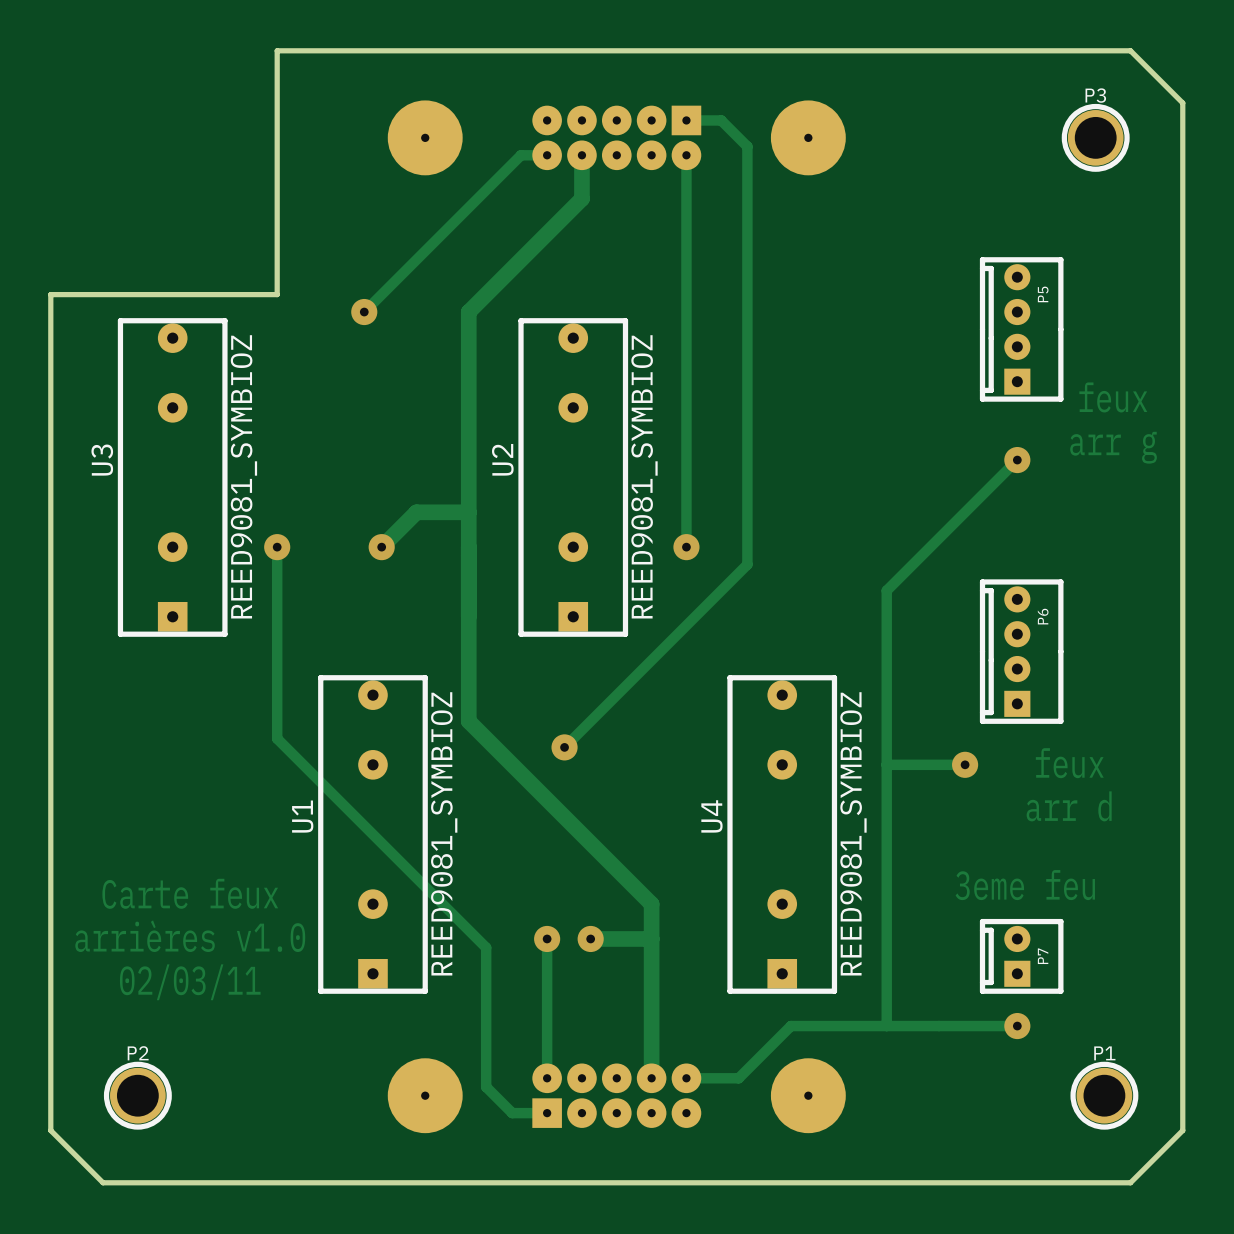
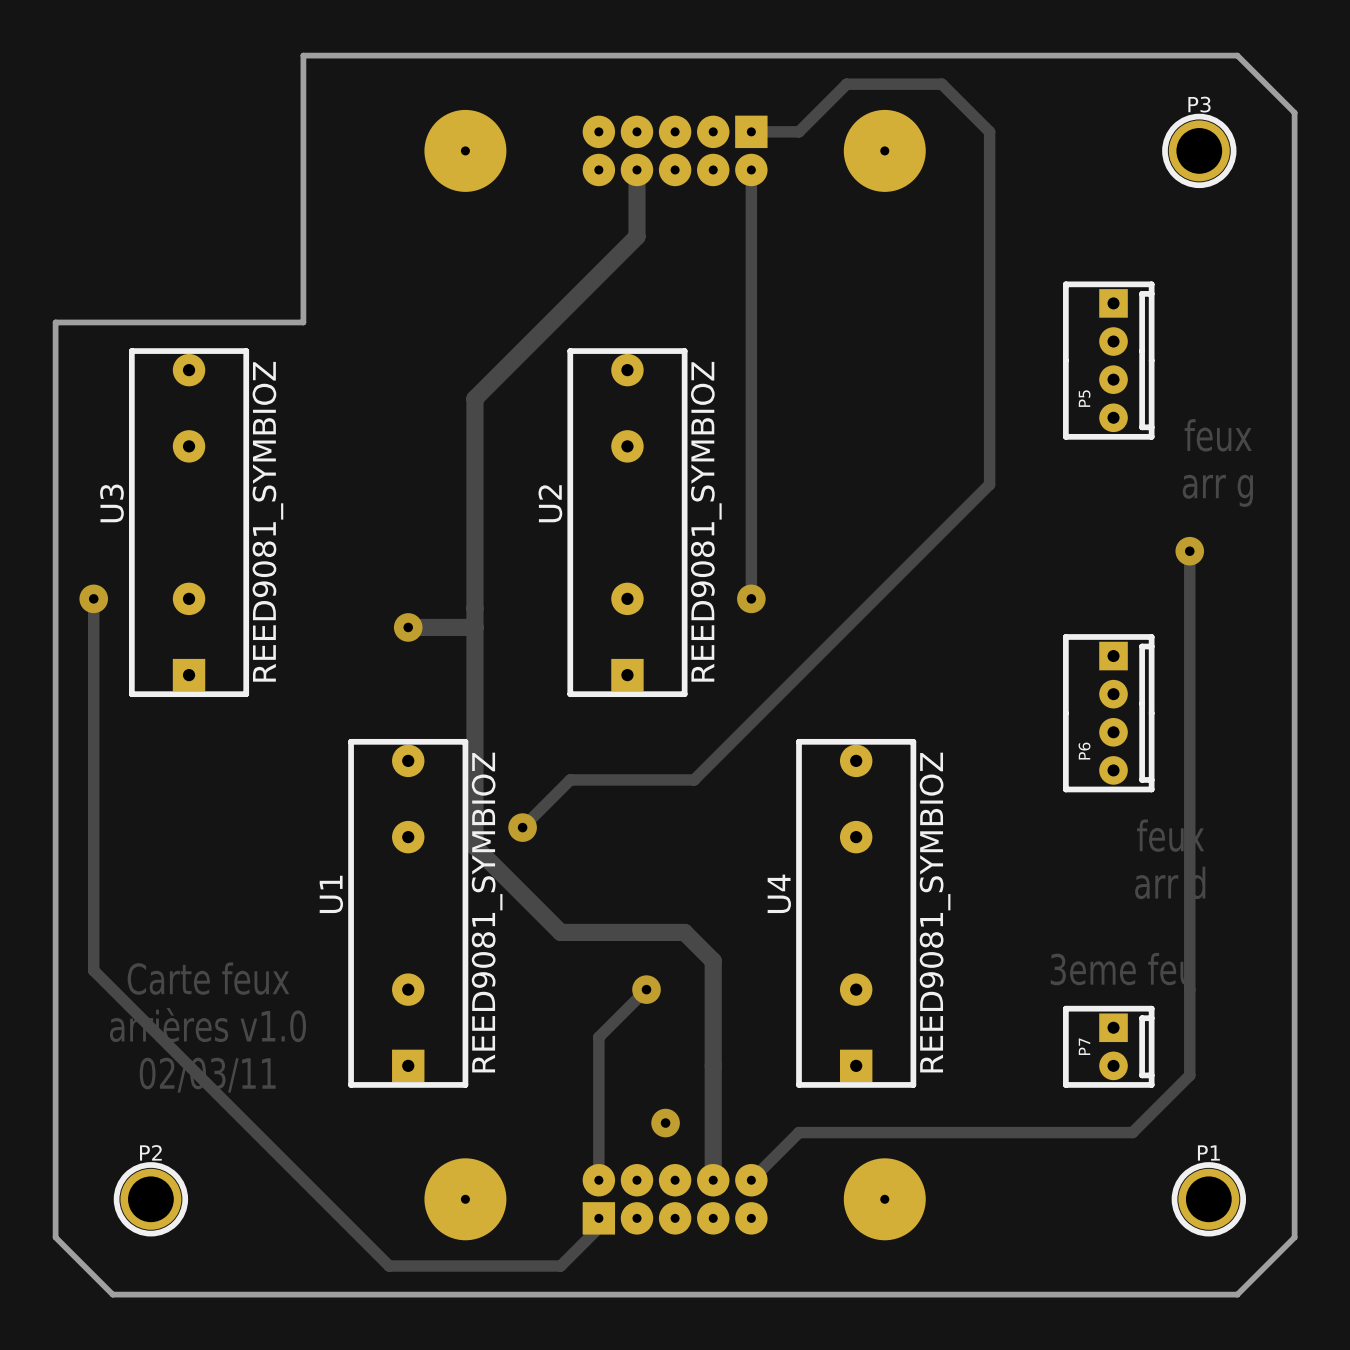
track: (721, 120) (747, 146) (747, 564) (564, 747) -> (789, 131) (799, 131) (846, 84) (941, 84) (989, 131) (989, 484) (694, 779) (570, 779) (522, 827)
track: (547, 155) (521, 155) (364, 312) -> none
track: (581, 198) (468, 312) (468, 721) (651, 904) -> (636, 217) (636, 236) (474, 398) (474, 846) (560, 932) (684, 932) (713, 961) (713, 989)
via: (364, 312) -> none
P5 rotation: 0° (1021, 329) -> 180° (1108, 360)
track: (1017, 460) (886, 590) (886, 1026) -> none
via position: (1017, 460) -> (1189, 551)
track: (468, 512) (416, 512) (381, 547) -> none
via: none -> (93, 598)
track: (277, 547) (277, 738) (486, 947) (486, 1087) (512, 1113) (547, 1113) -> (93, 598) (93, 970) (389, 1266) (560, 1266) (598, 1227) (598, 1218)
via: (277, 547) -> none
via position: (381, 547) -> (408, 627)
track: none -> (408, 627) (474, 627)
P6 rotation: 0° (1021, 651) -> 180° (1108, 713)
via: (564, 747) -> none
via: none -> (522, 827)
track: (886, 764) (965, 764) -> none
via: (965, 764) -> none
via: none -> (646, 989)
track: (547, 938) (547, 1078) -> (646, 989) (598, 1037) (598, 1180)
via: (547, 938) -> none
track: (590, 938) (651, 938) -> none
via: (590, 938) -> none
P7 rotation: 0° (1021, 956) -> 180° (1108, 1046)
via: none -> (665, 1123)
track: (1017, 1026) (790, 1026) (738, 1078) (686, 1078) -> (1189, 551) (1189, 1075) (1132, 1132) (799, 1132) (751, 1180)
via: (1017, 1026) -> none

